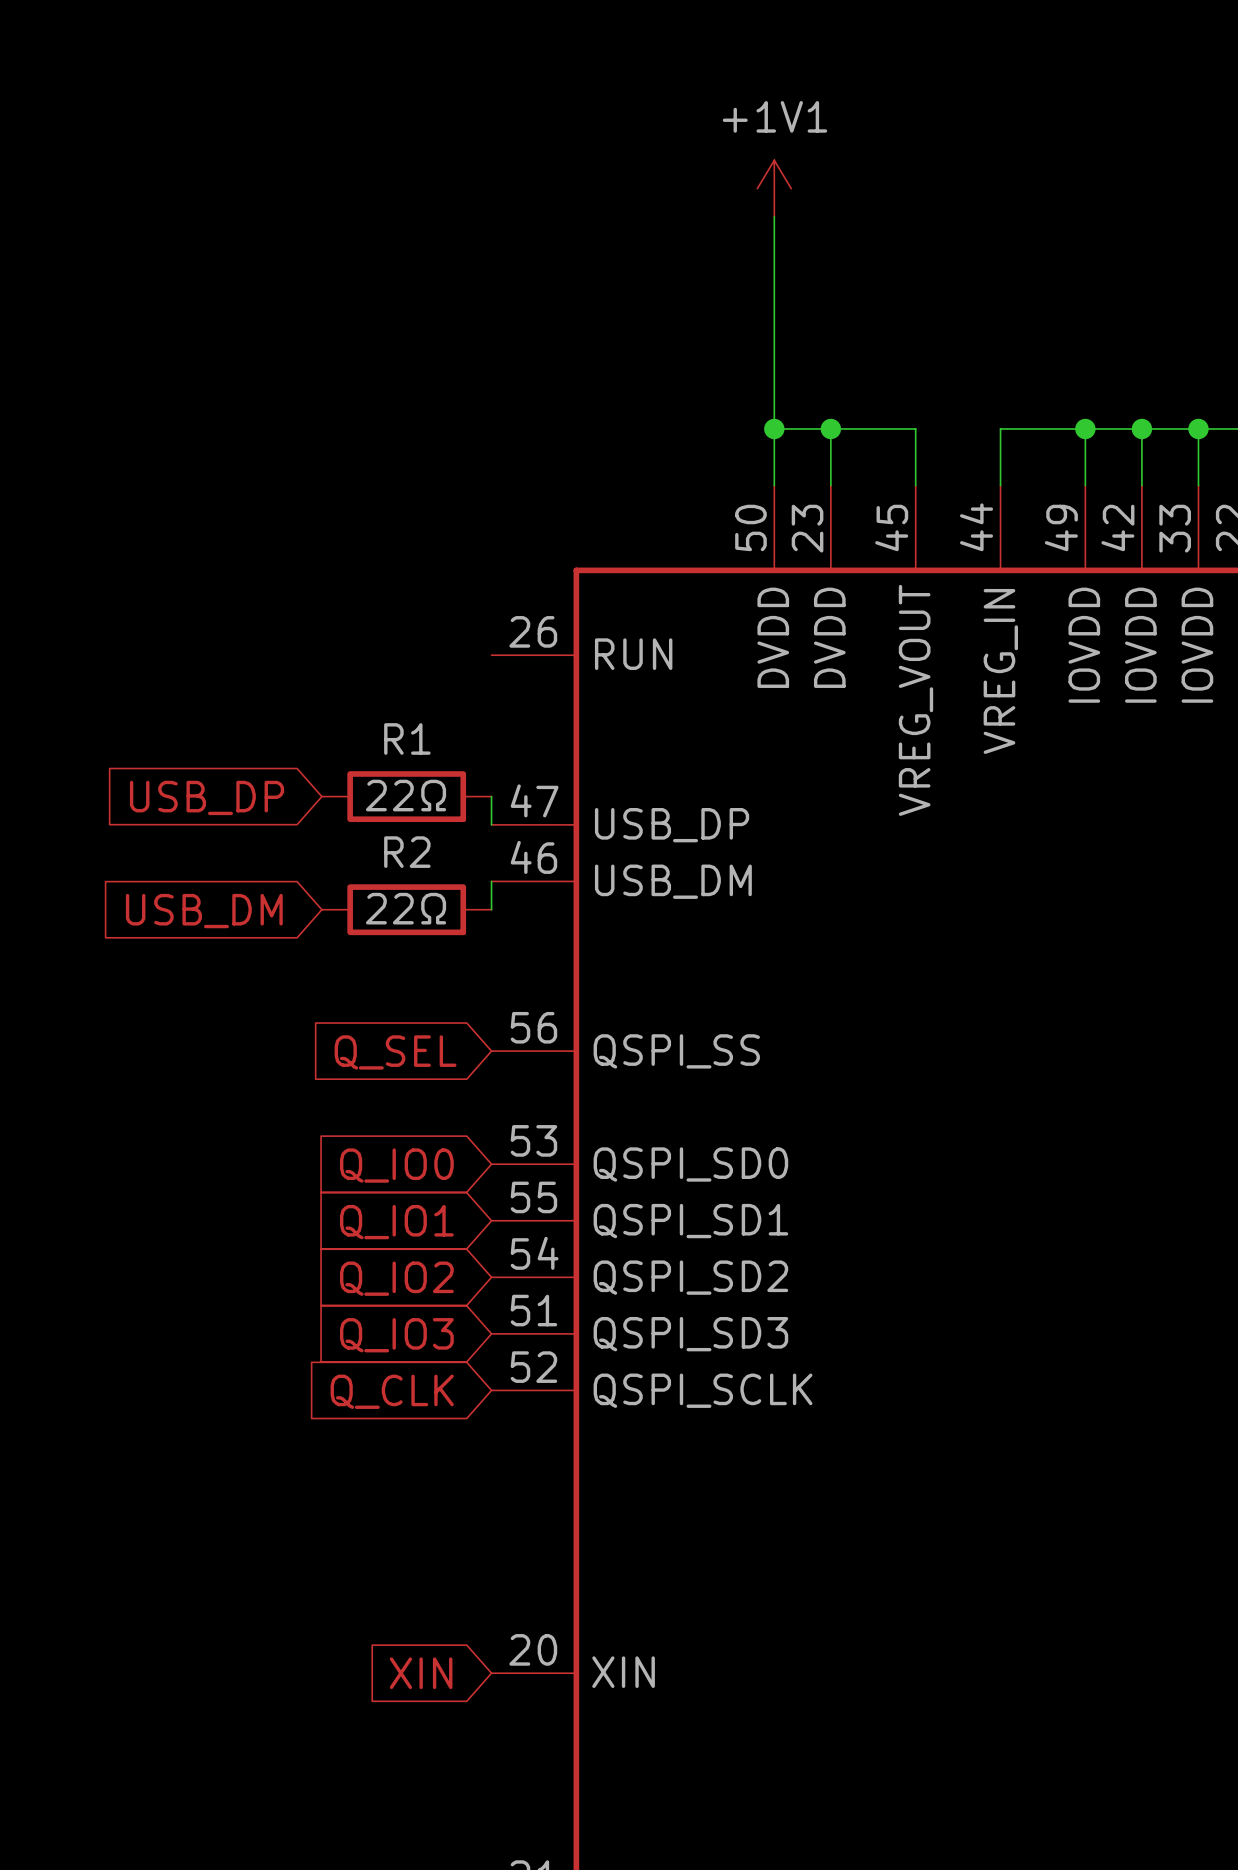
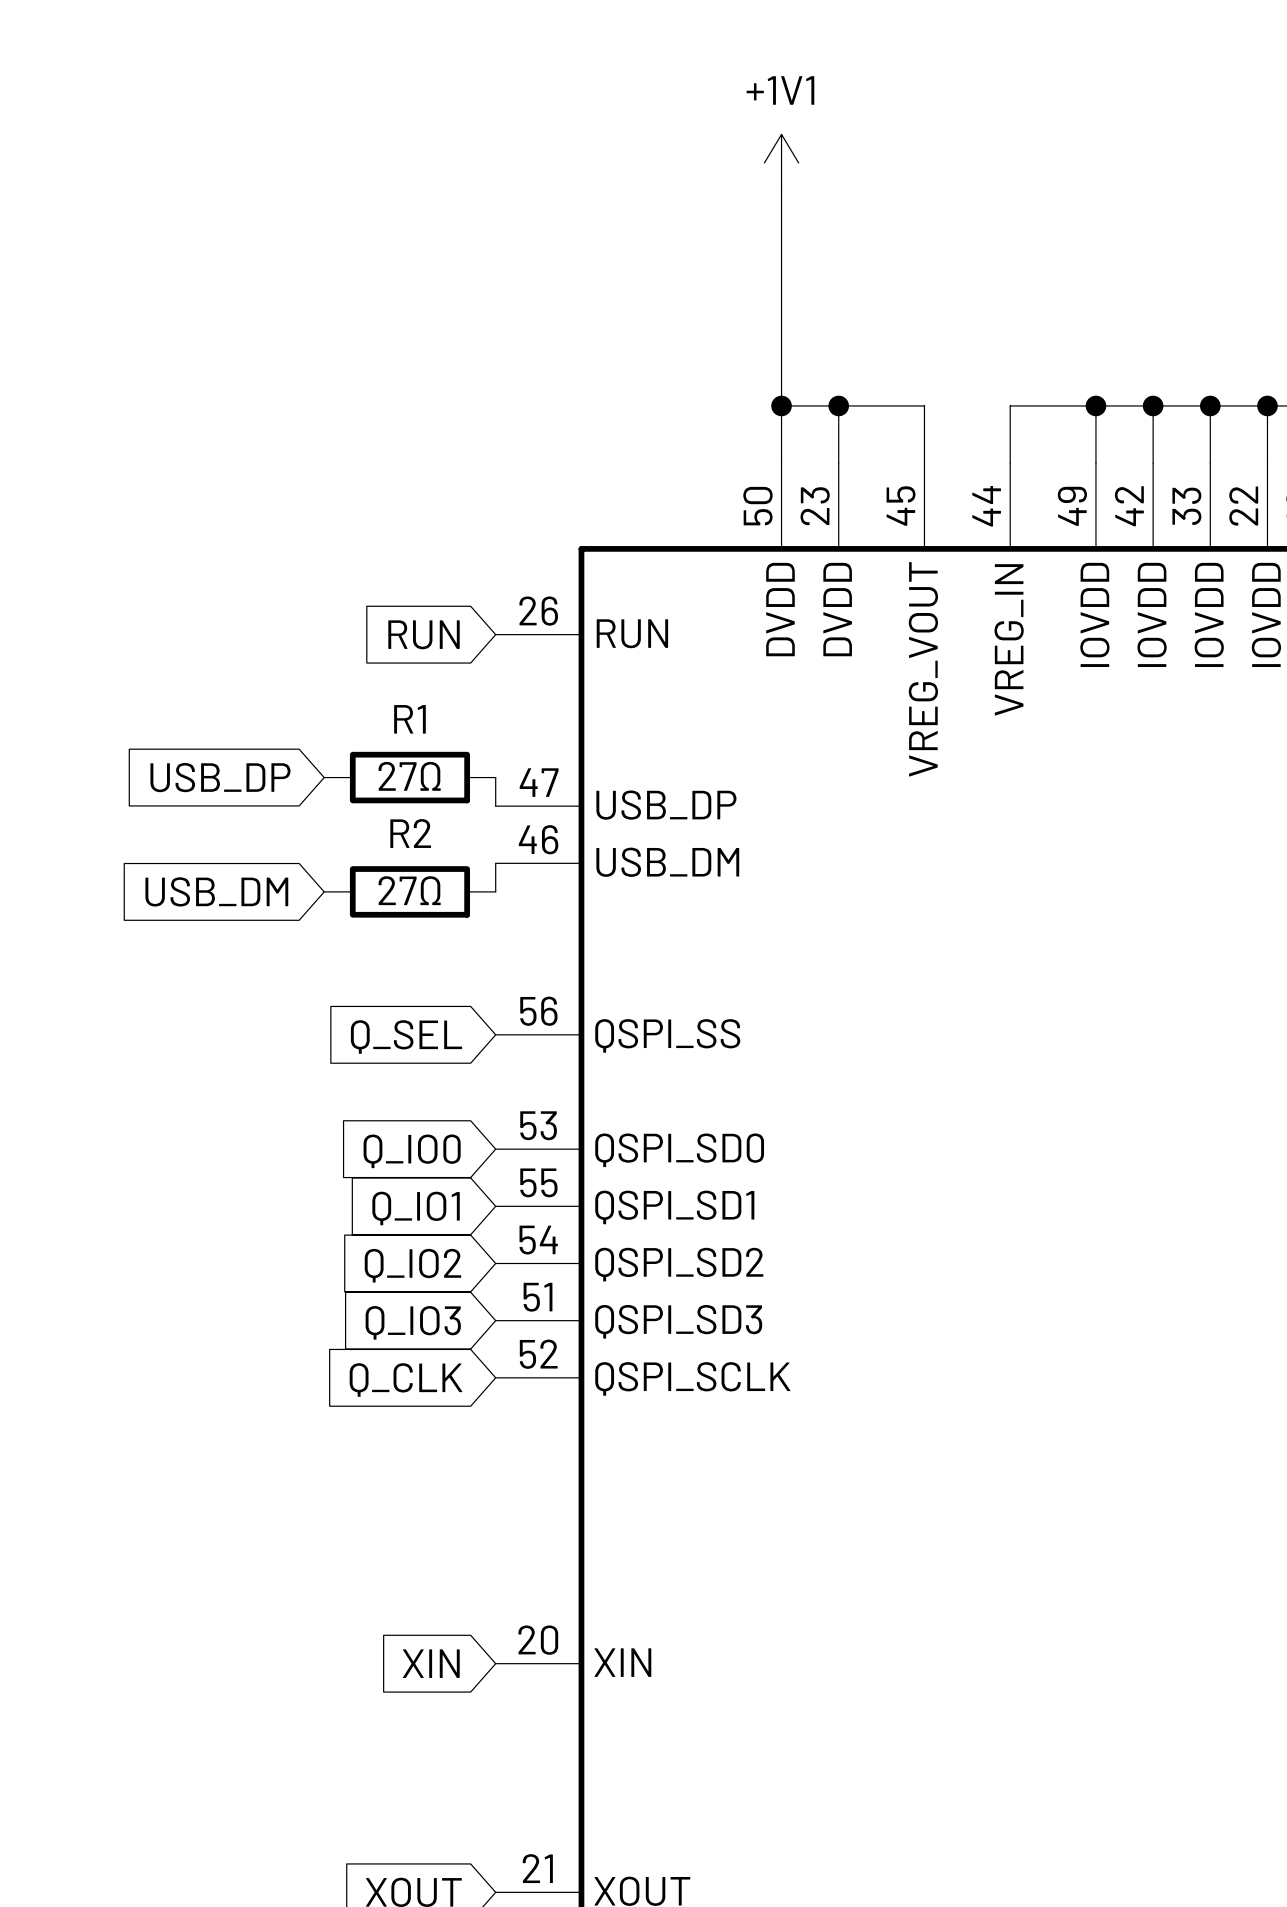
global label: none -> RUN (424, 634)
R1 value: 22Ω (406, 795) -> 27Ω (409, 776)
R2 value: 22Ω (406, 908) -> 27Ω (409, 890)

